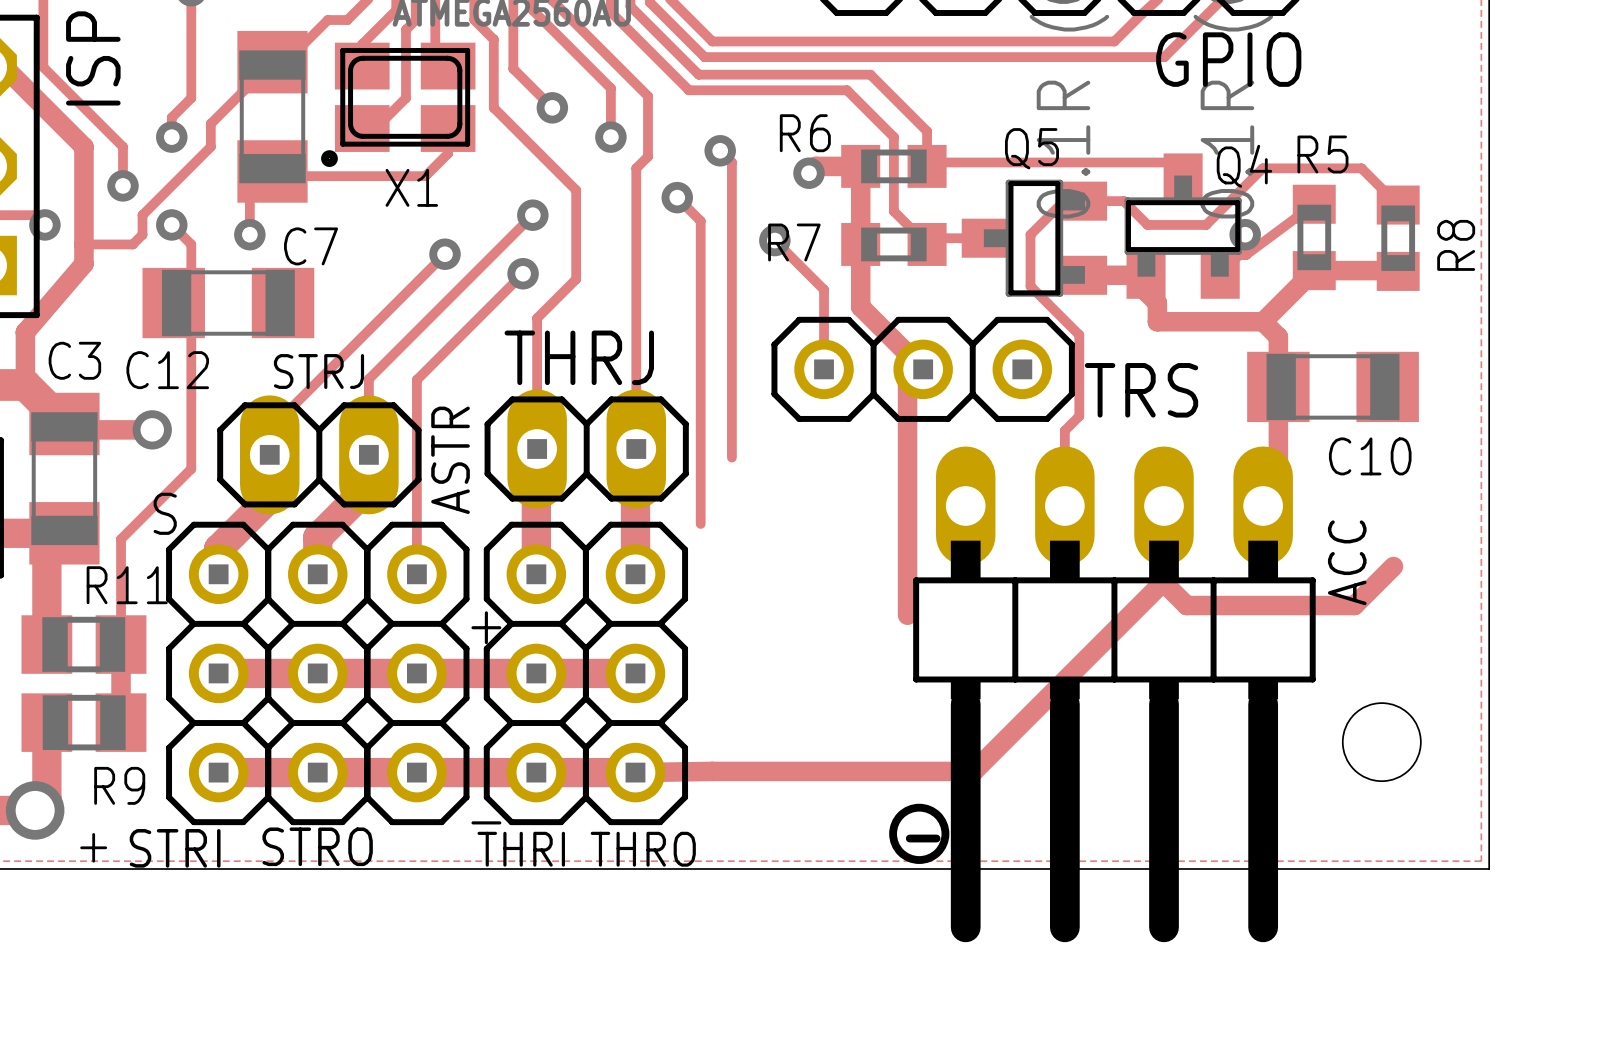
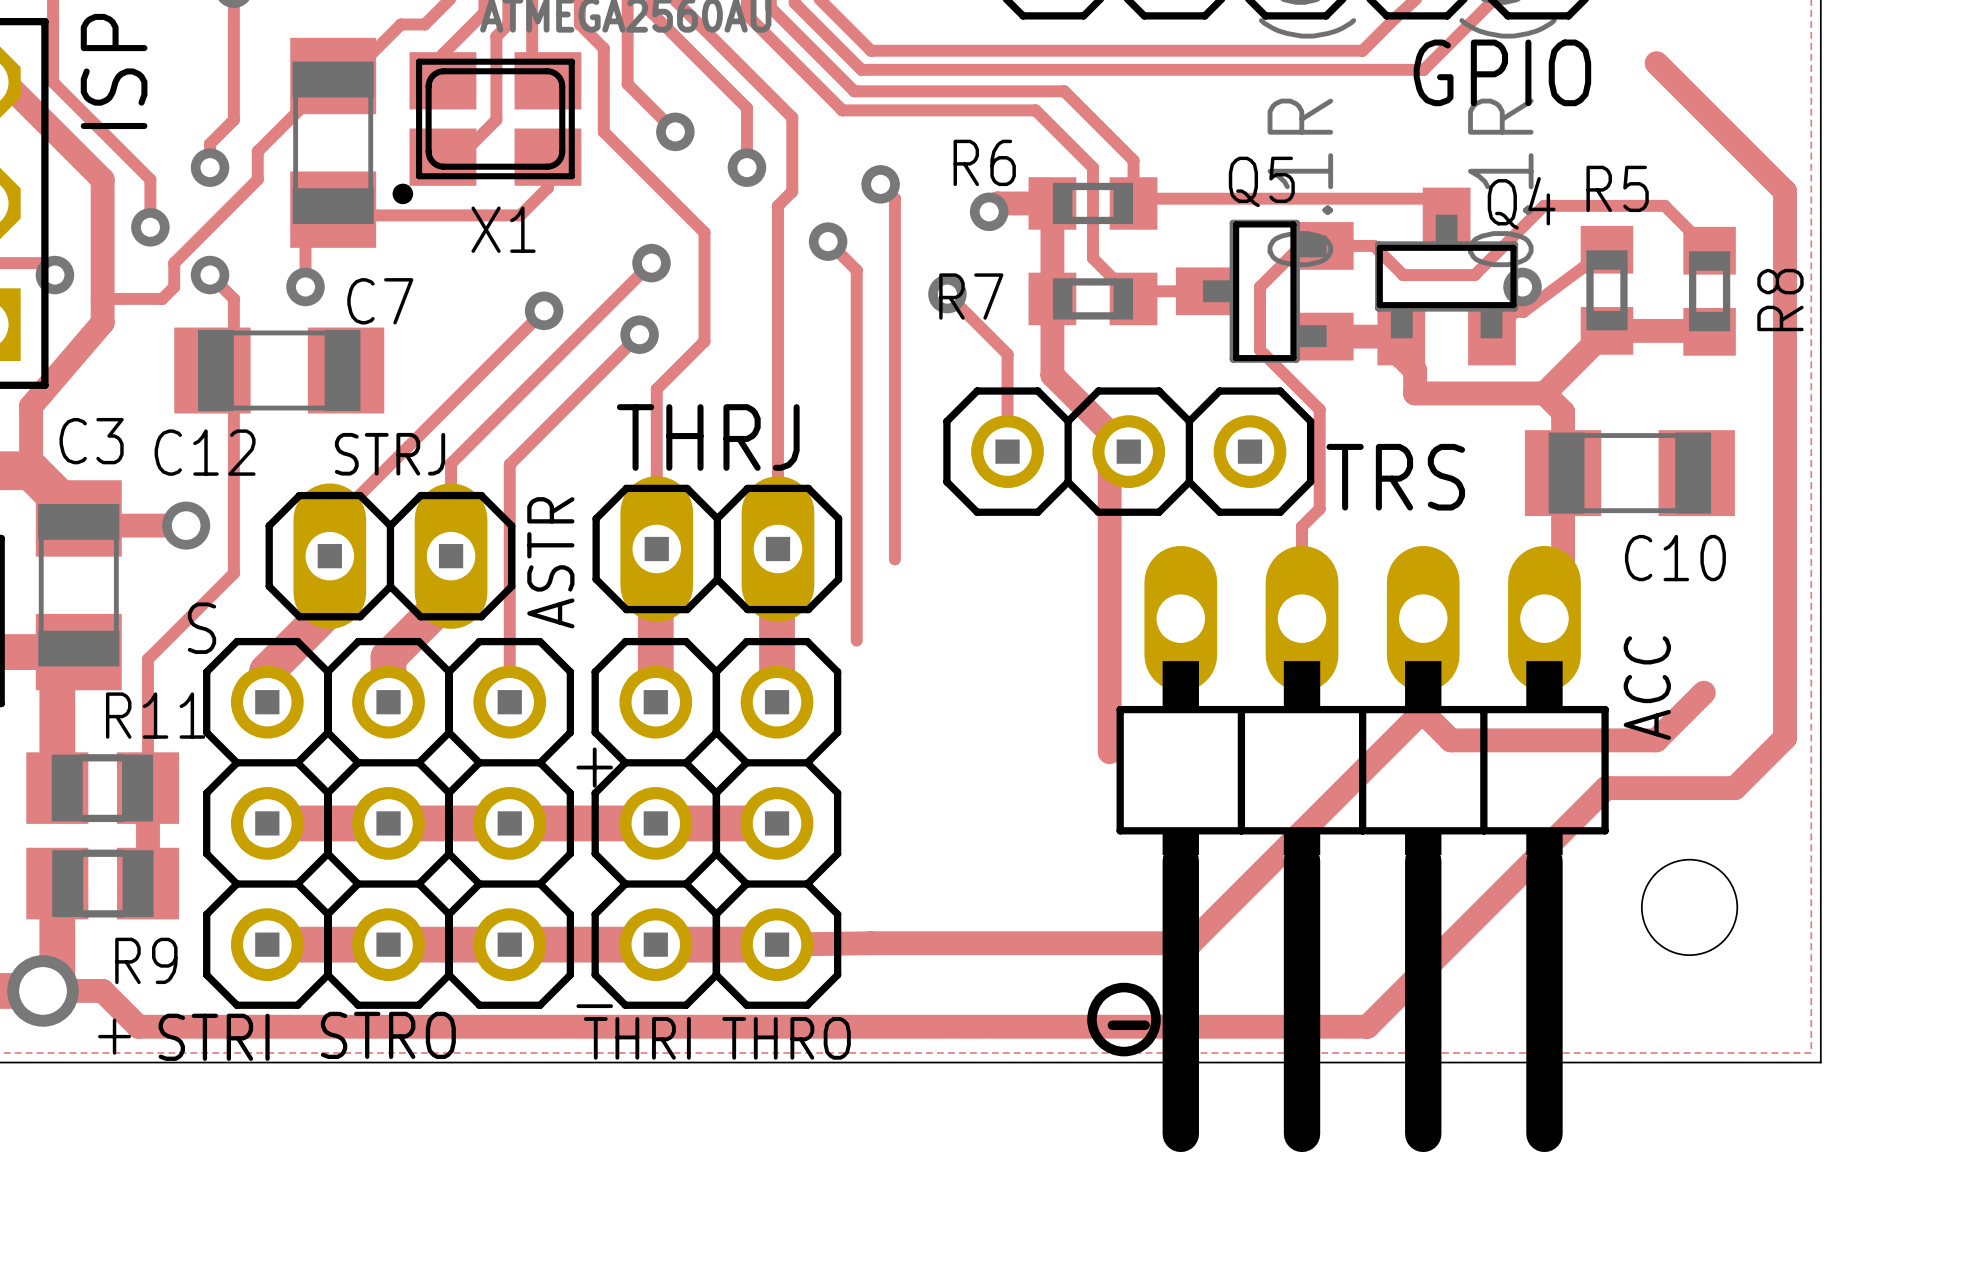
track: none -> (1656, 63) (1785, 191) (1785, 737) (1734, 788) (1606, 788) (1367, 1026) (138, 1026) (102, 990) (42, 990)

